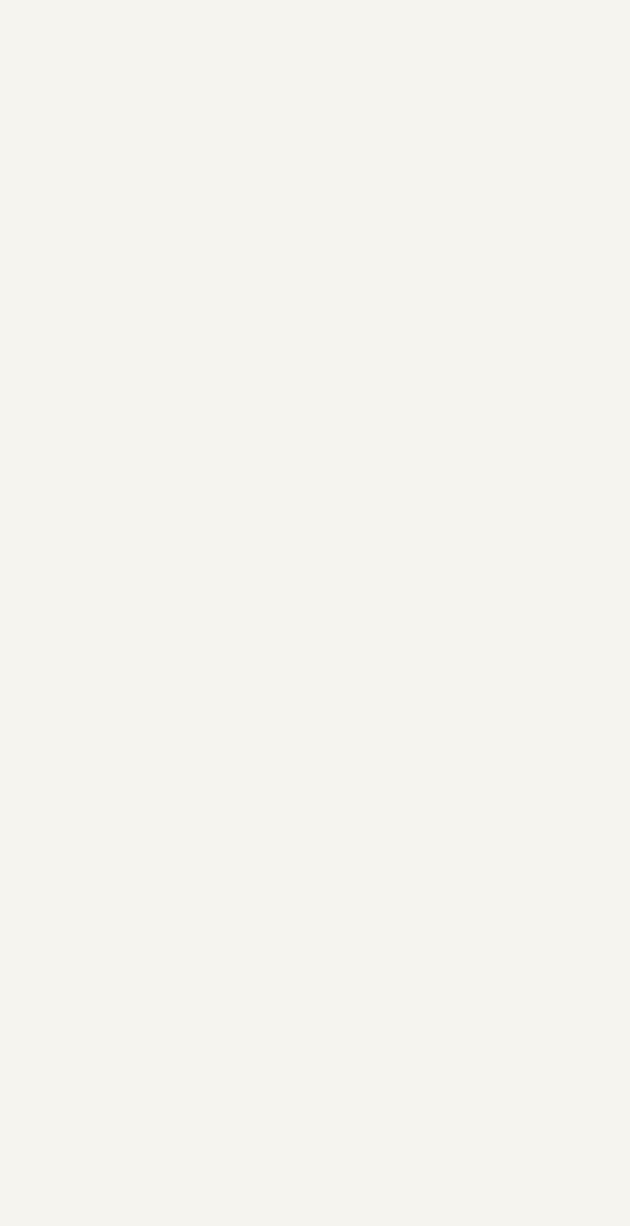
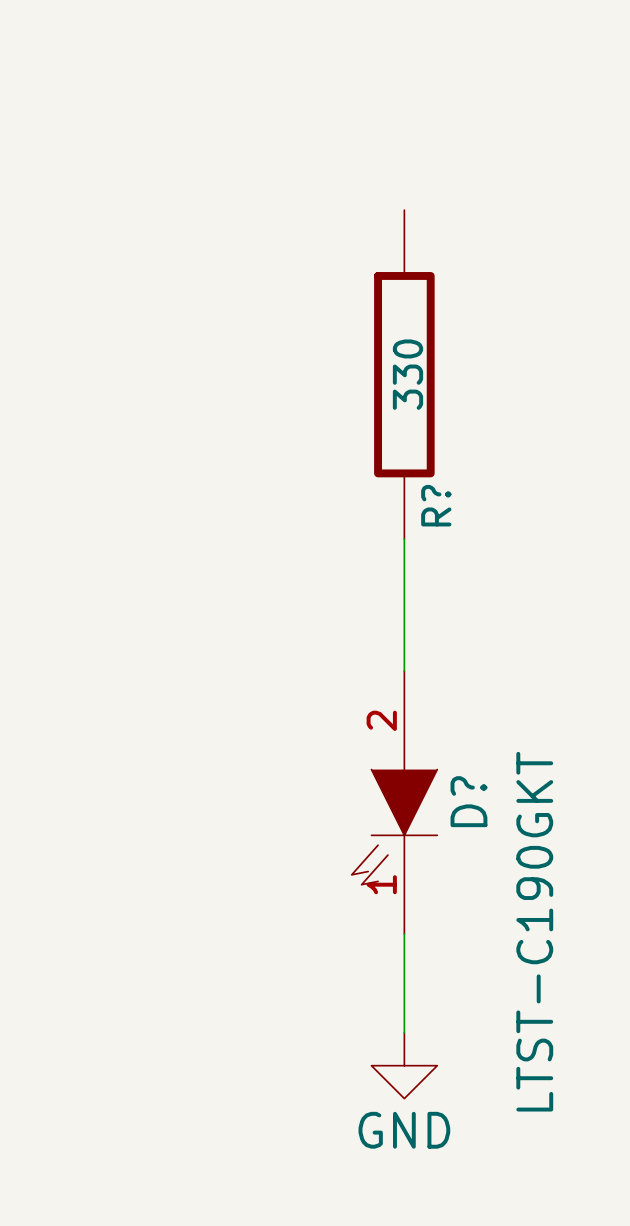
R?: none -> 330 (404, 374)
wire: none -> (404, 539) (404, 670)
D?: none -> LTST-C190GKT (394, 802)
wire: none -> (404, 934) (404, 1032)
power symbol: none -> GND (404, 1065)

